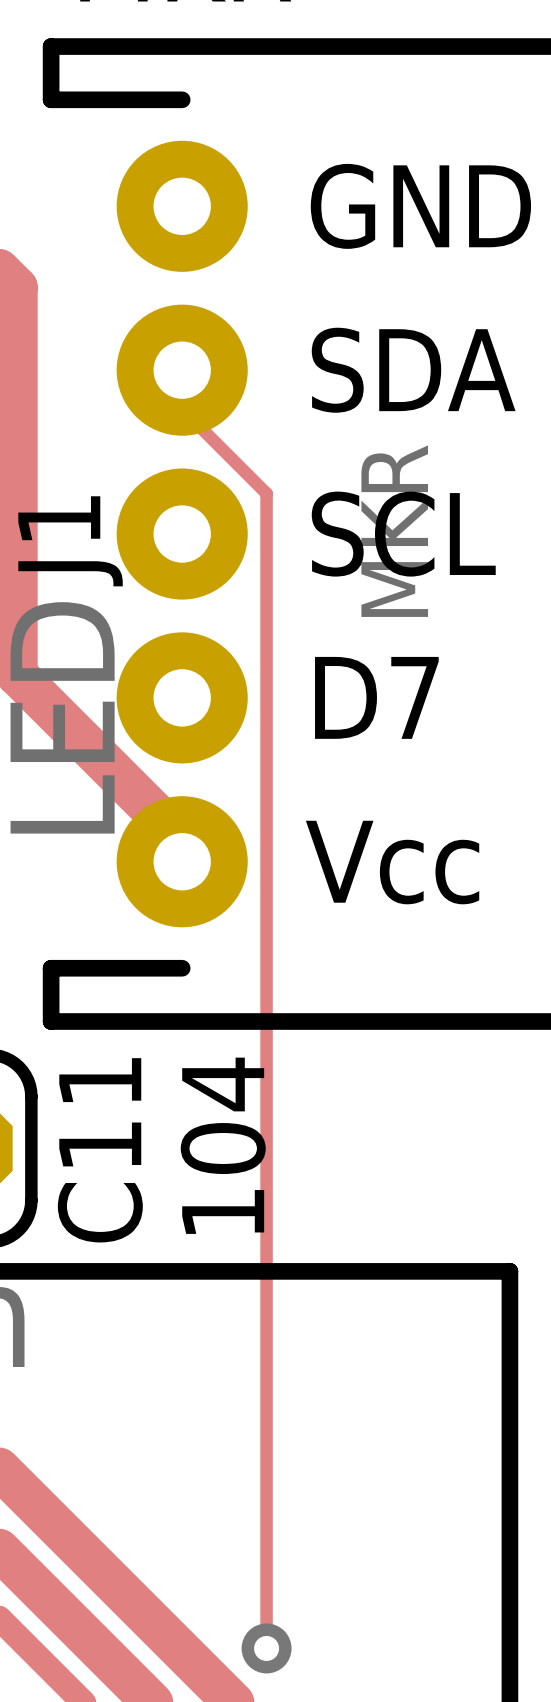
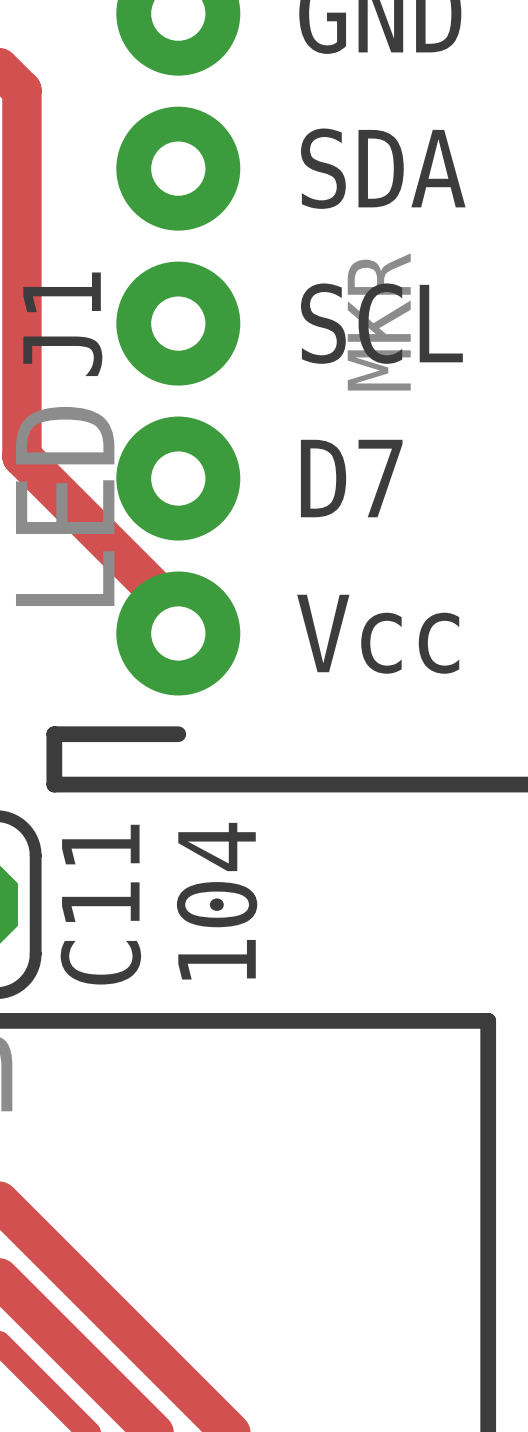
track: (182, 370) (185, 374) (185, 412) (266, 493) (266, 1648) -> none
via: (266, 1648) -> none

